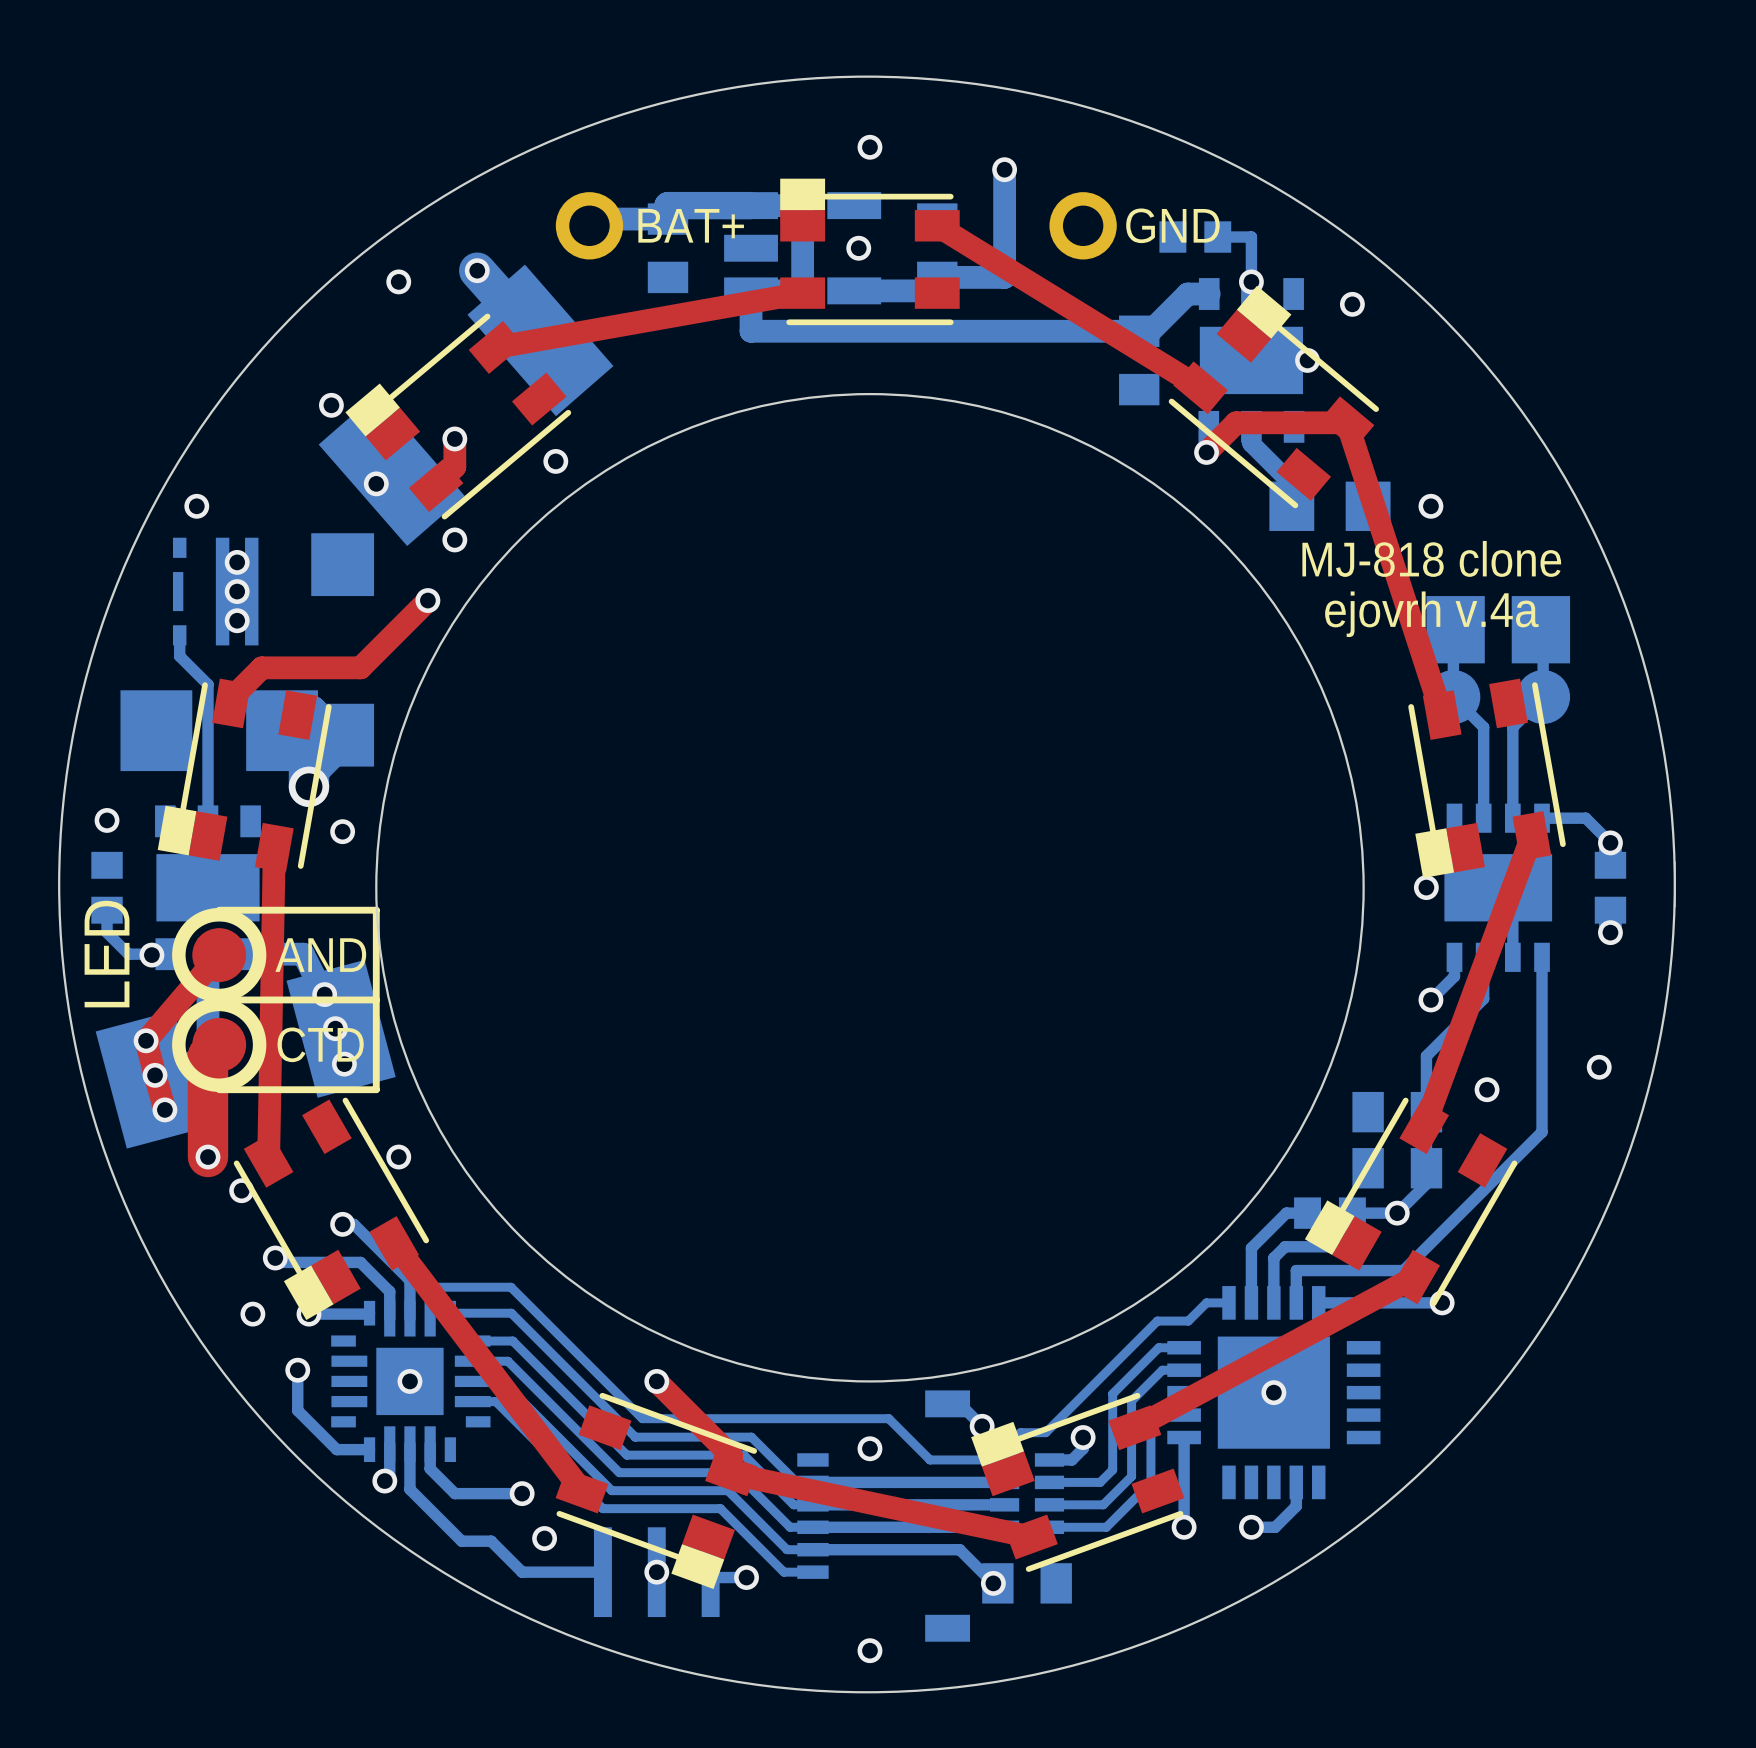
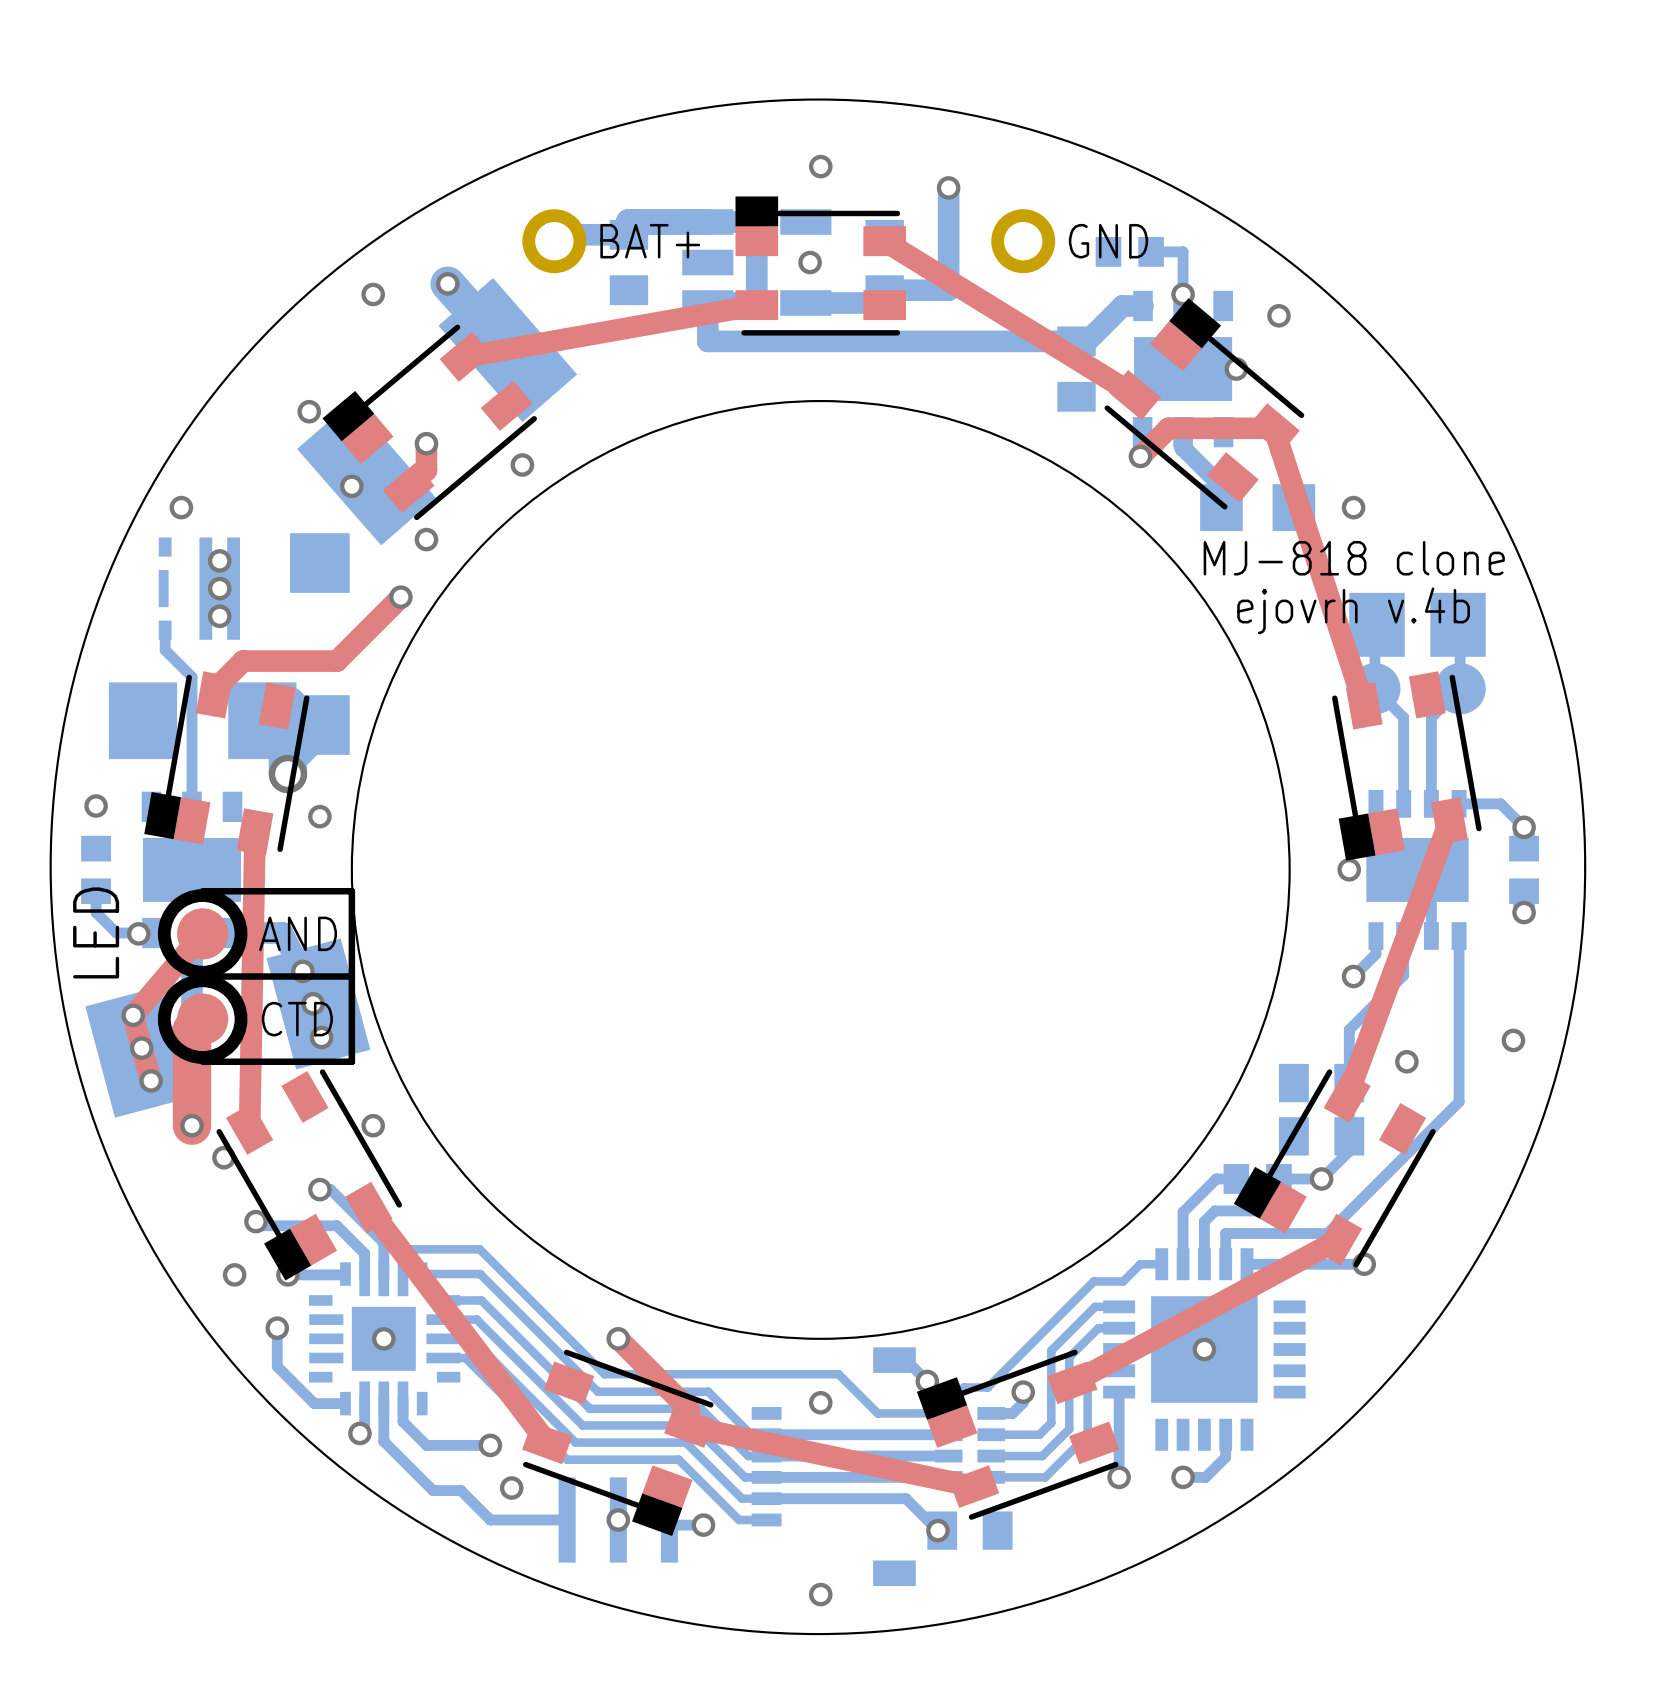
text: ejovrh v.4a (1431, 614) -> ejovrh v.4b (1353, 610)

